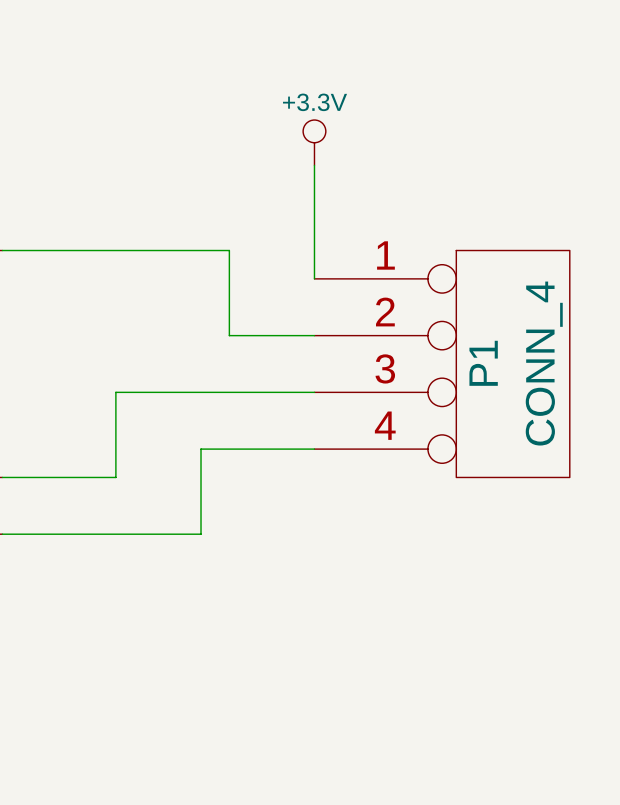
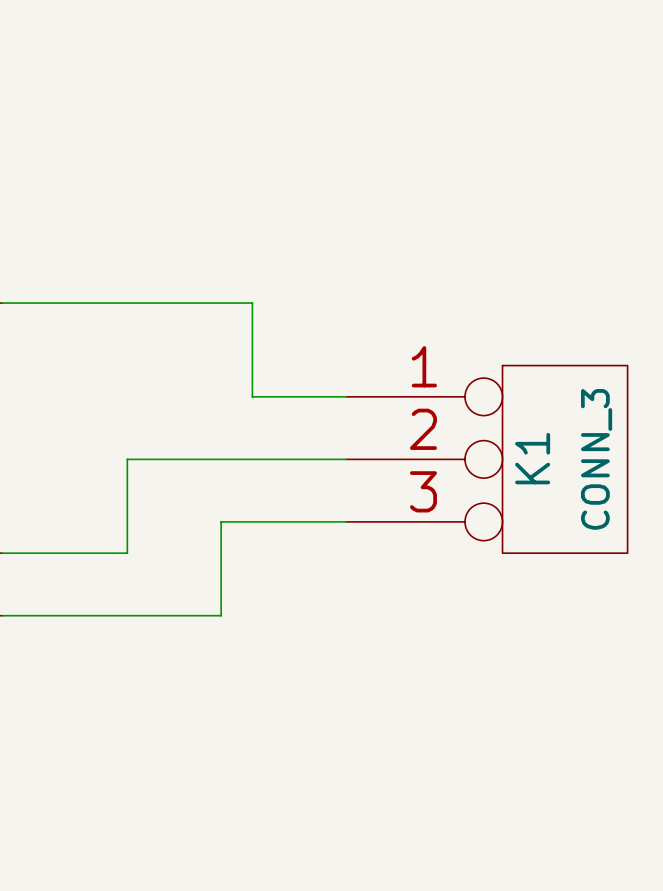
power symbol: +3.3V (314, 142) -> none
wire: (314, 165) (314, 278) -> none
P1: CONN_4 (442, 363) -> none
K1: none -> CONN_3 (486, 459)

